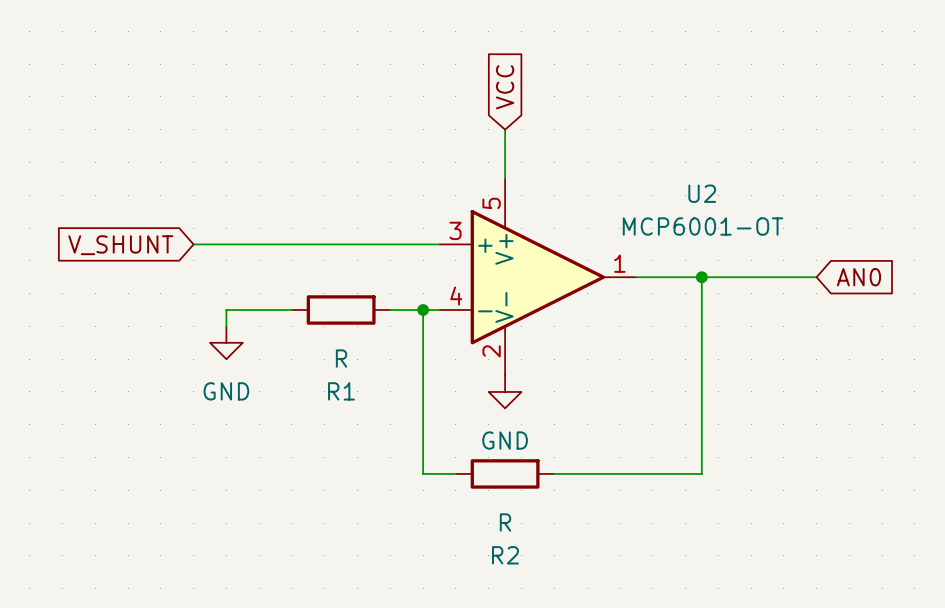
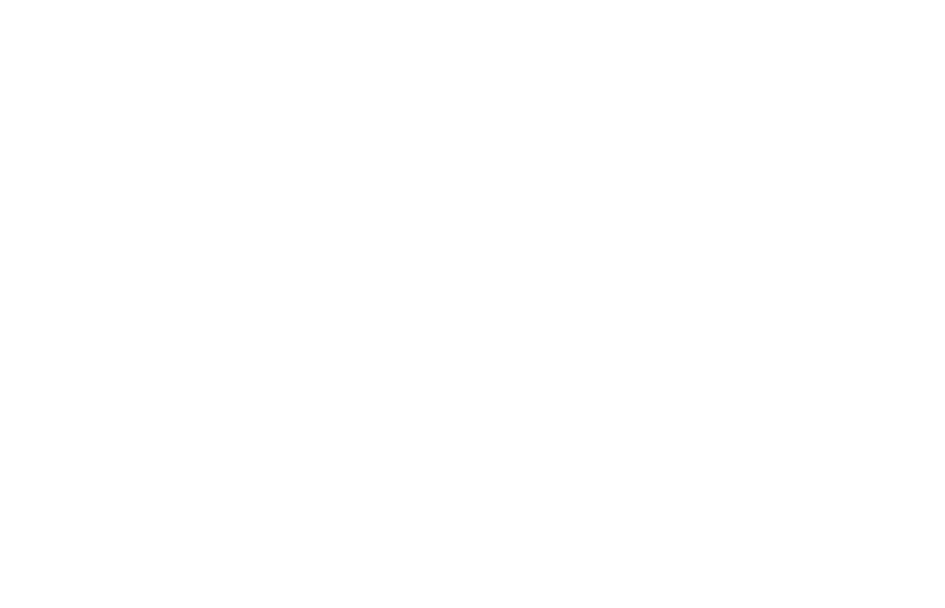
global label: VCC (505, 87) -> none
wire: (505, 129) (505, 178) -> none
wire: (193, 244) (439, 244) -> none
global label: V_SHUNT (120, 245) -> none
U2: MCP6001-OT (537, 277) -> none
wire: (636, 277) (816, 277) -> none
wire: (701, 277) (701, 473) (554, 473) -> none
junction: (701, 277) -> none
global label: AN0 (858, 277) -> none
wire: (291, 310) (226, 310) (226, 326) -> none
R1: R (341, 310) -> none
wire: (390, 310) (439, 310) -> none
wire: (423, 310) (423, 473) (455, 473) -> none
junction: (423, 310) -> none
power symbol: GND (226, 342) -> none
power symbol: GND (505, 391) -> none
R2: R (505, 473) -> none

